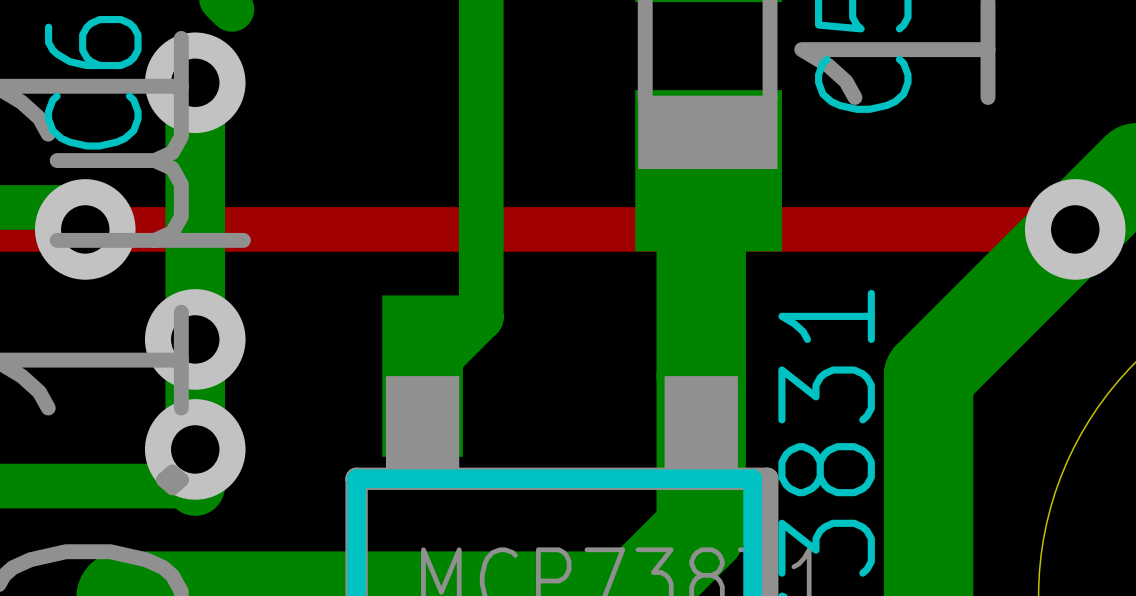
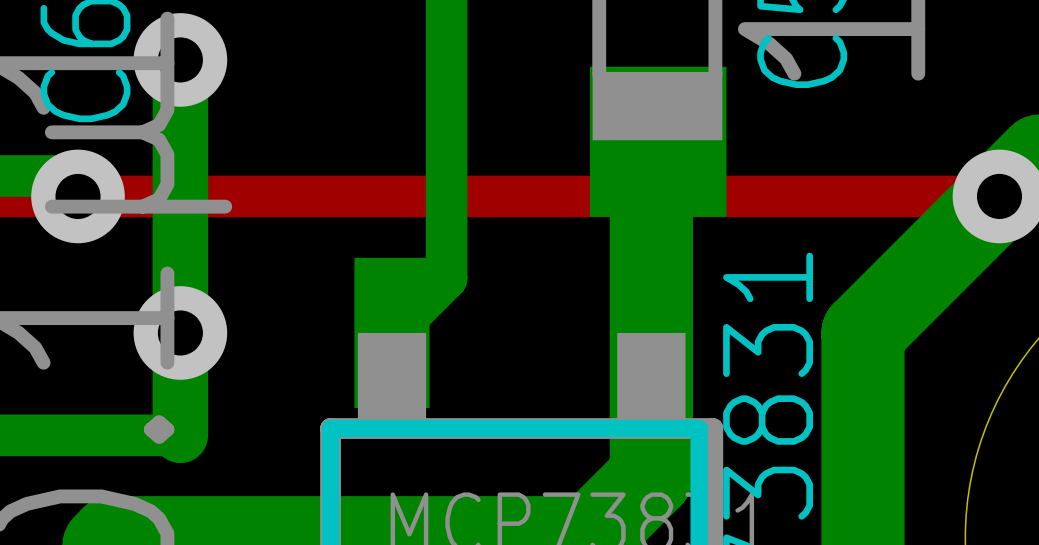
via: (195, 339) -> none
via: none -> (180, 332)
via: (195, 449) -> none

